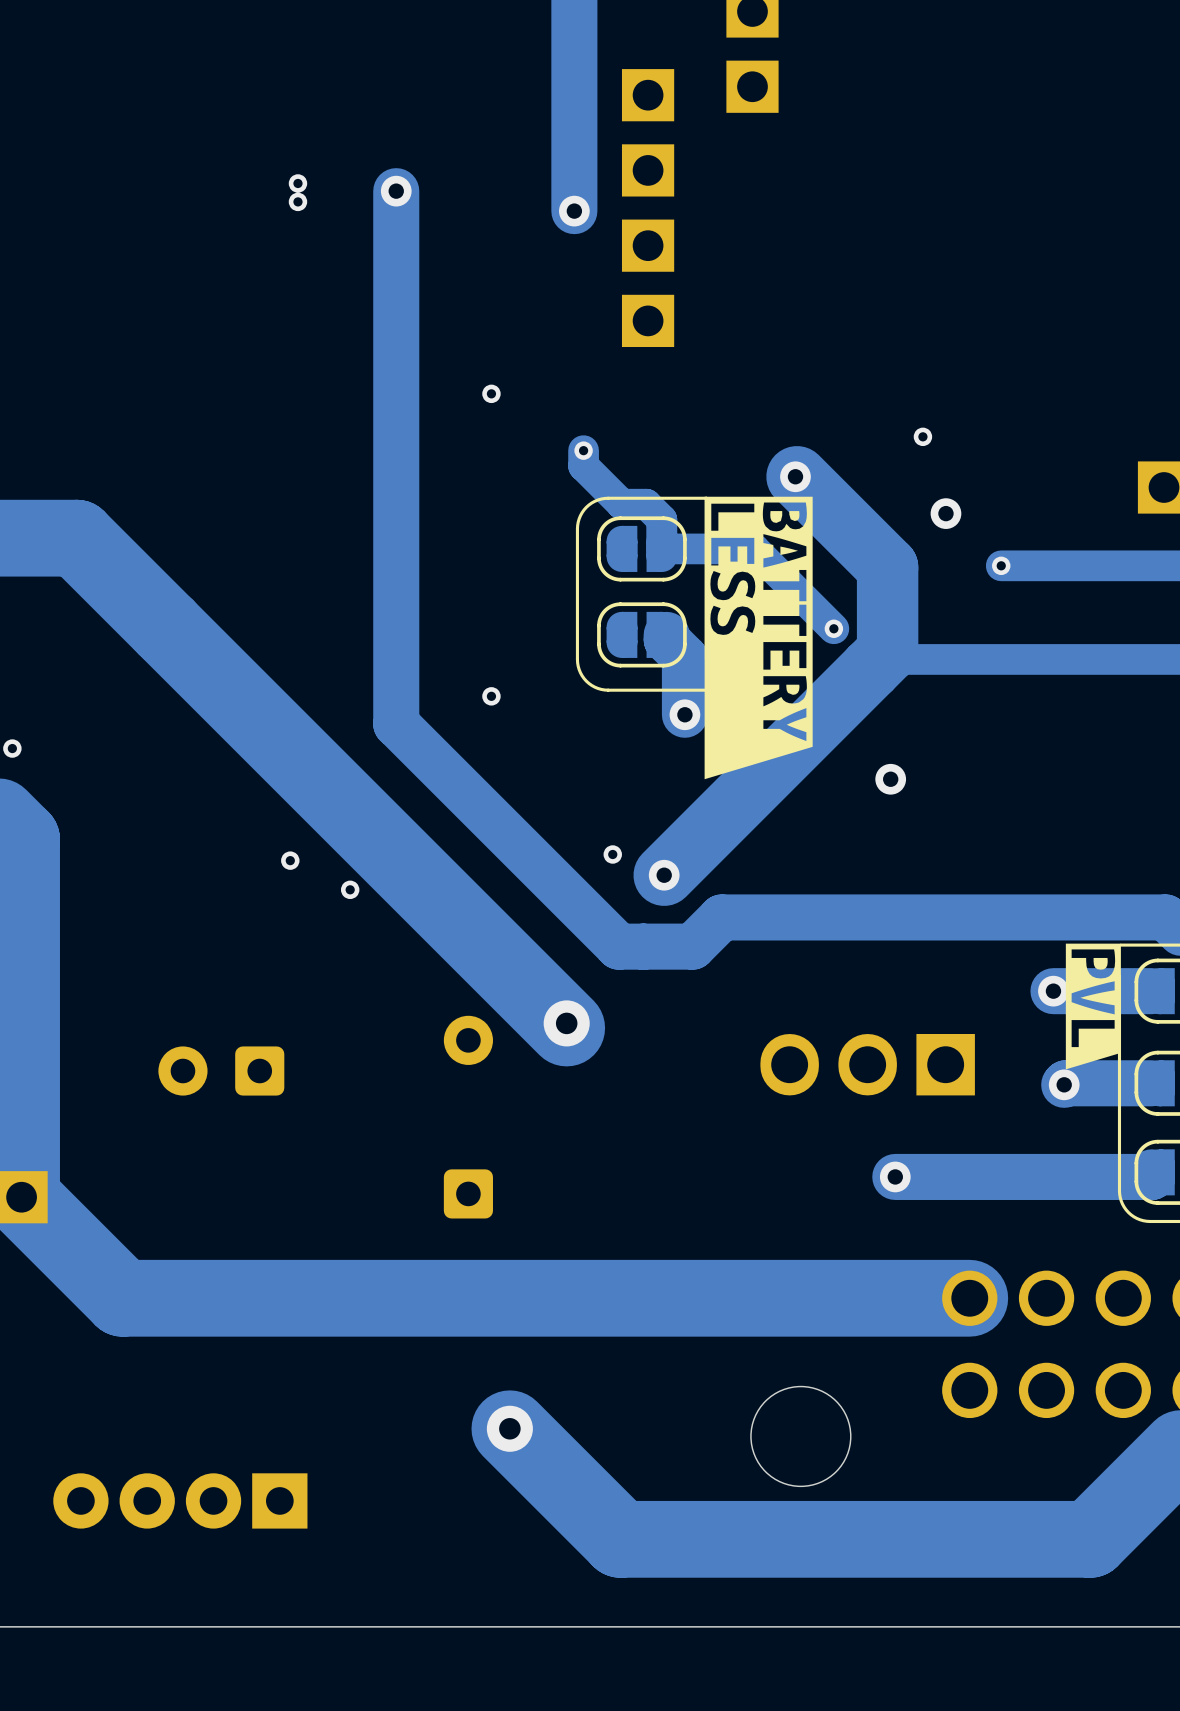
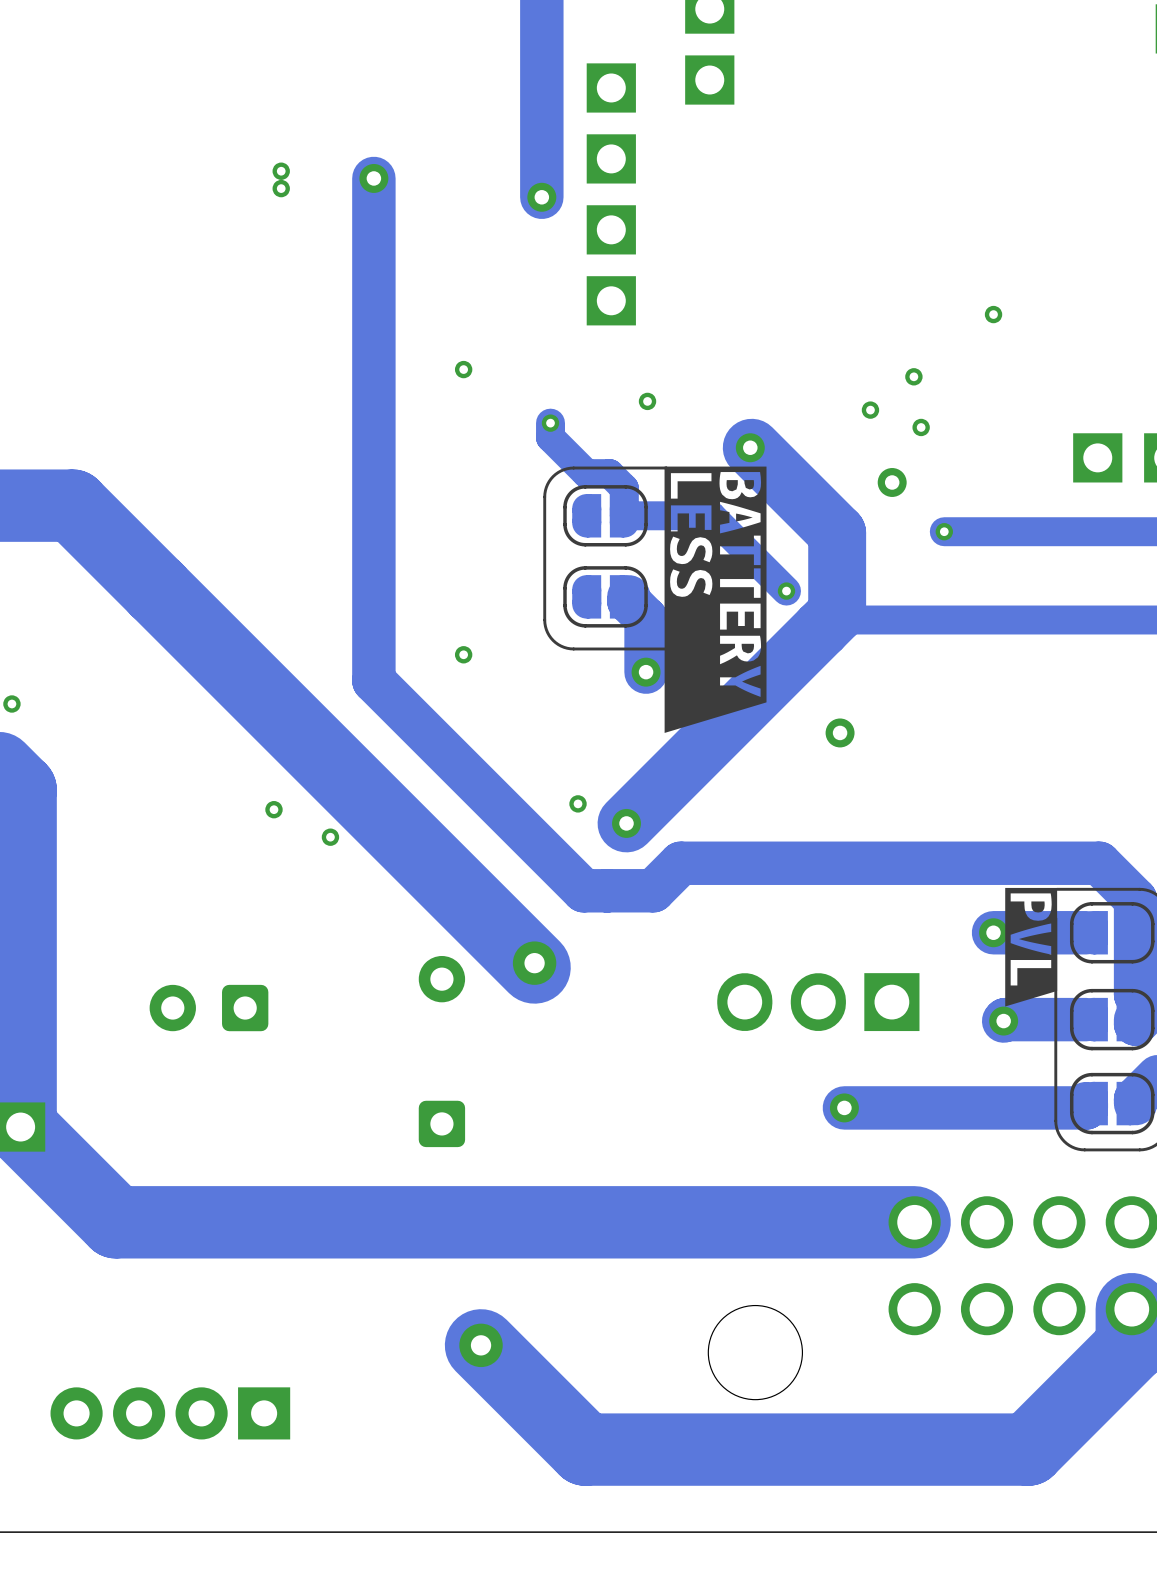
via: none -> (993, 314)
via: none -> (913, 376)
via: none -> (647, 401)
via: none -> (921, 427)

